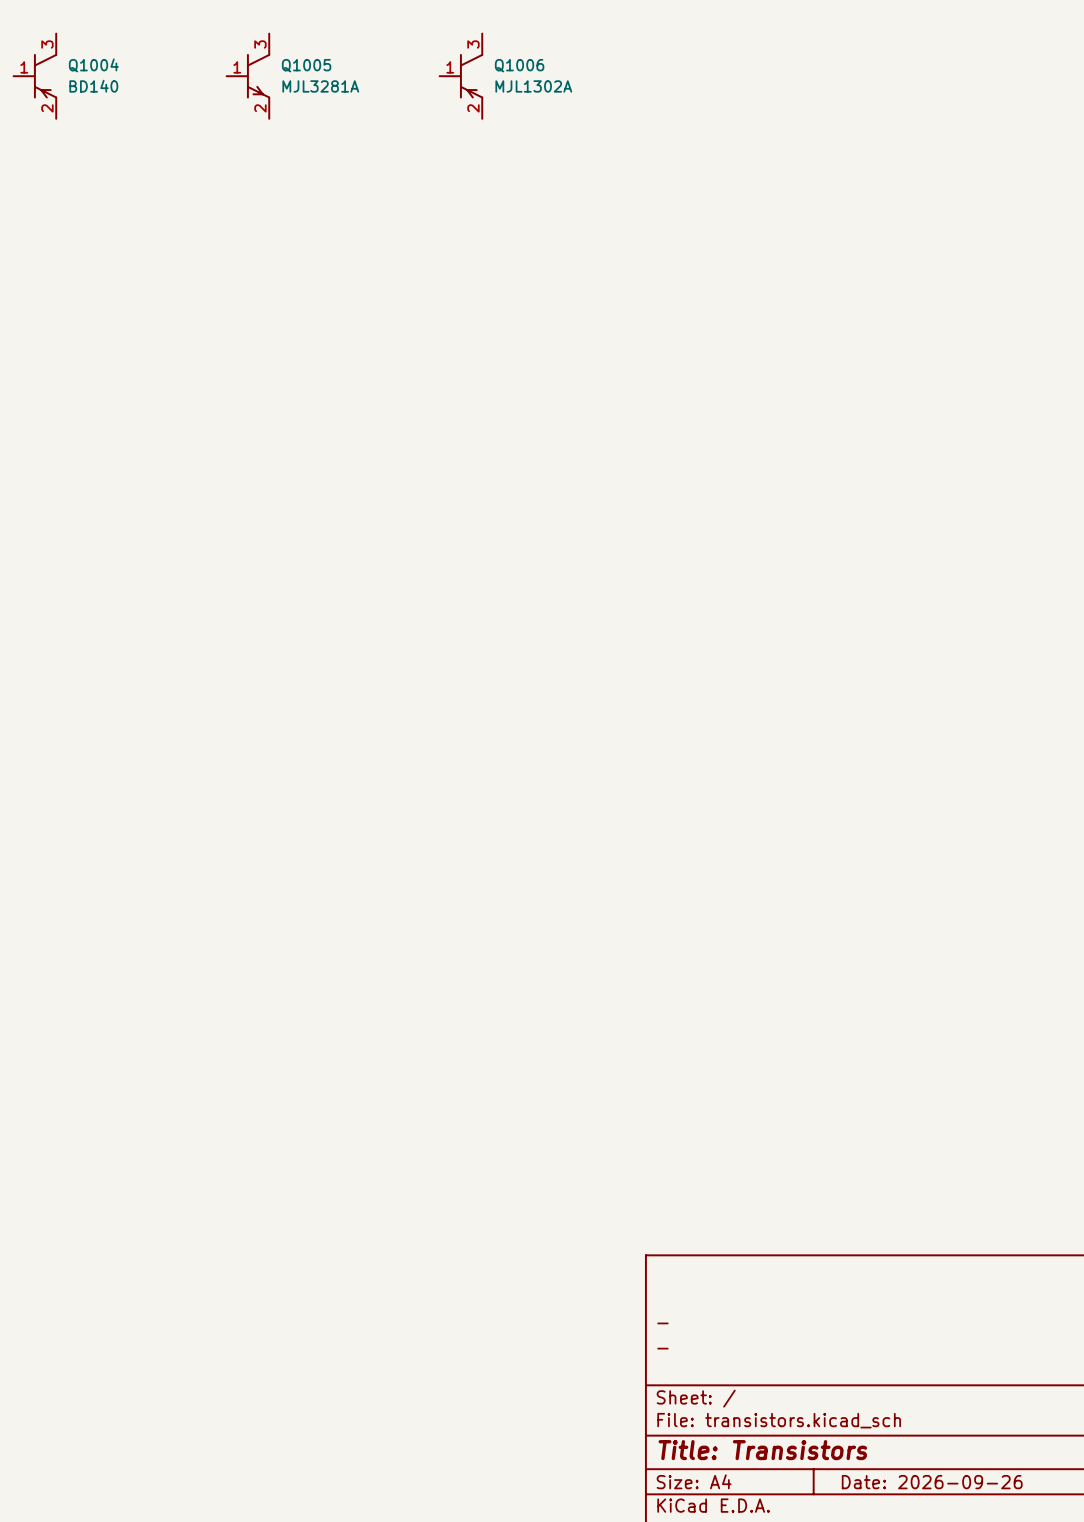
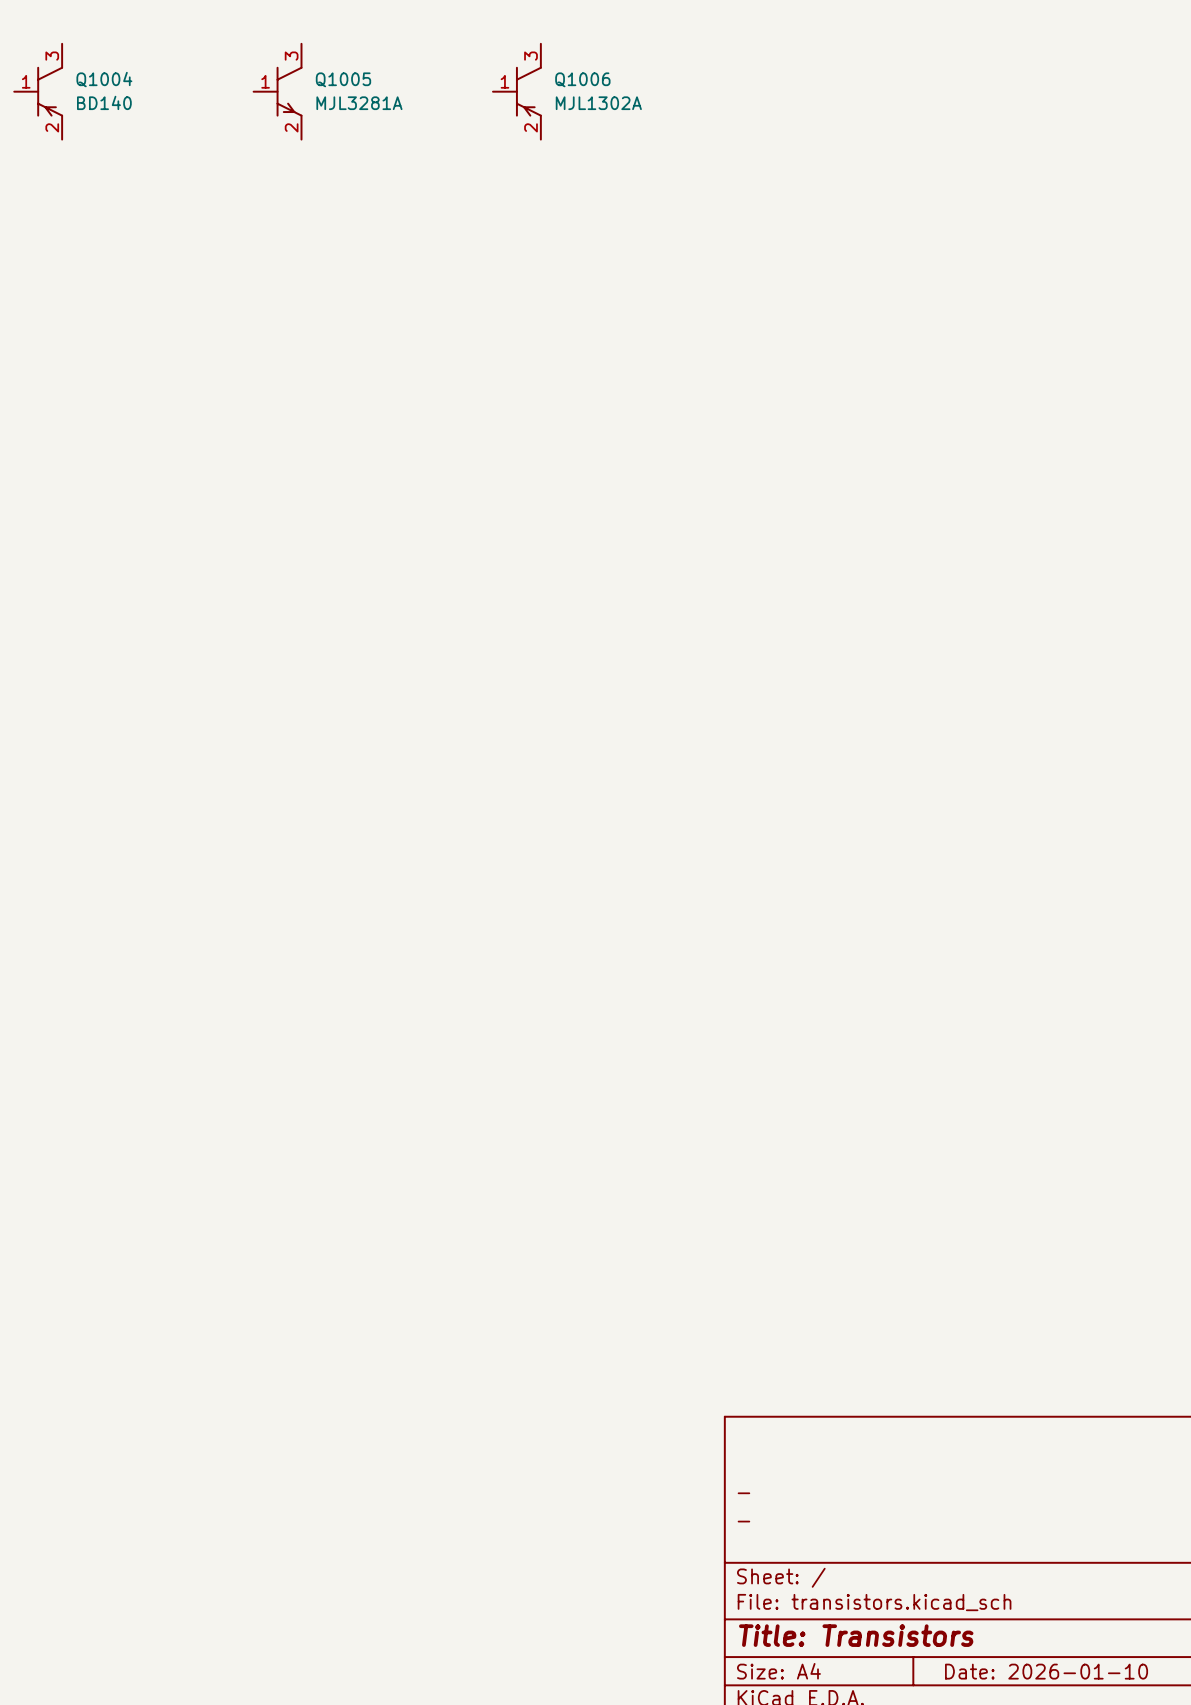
title block: Date: 2026-09-26 (932, 1482) -> Date: 2026-01-10 (1046, 1671)

